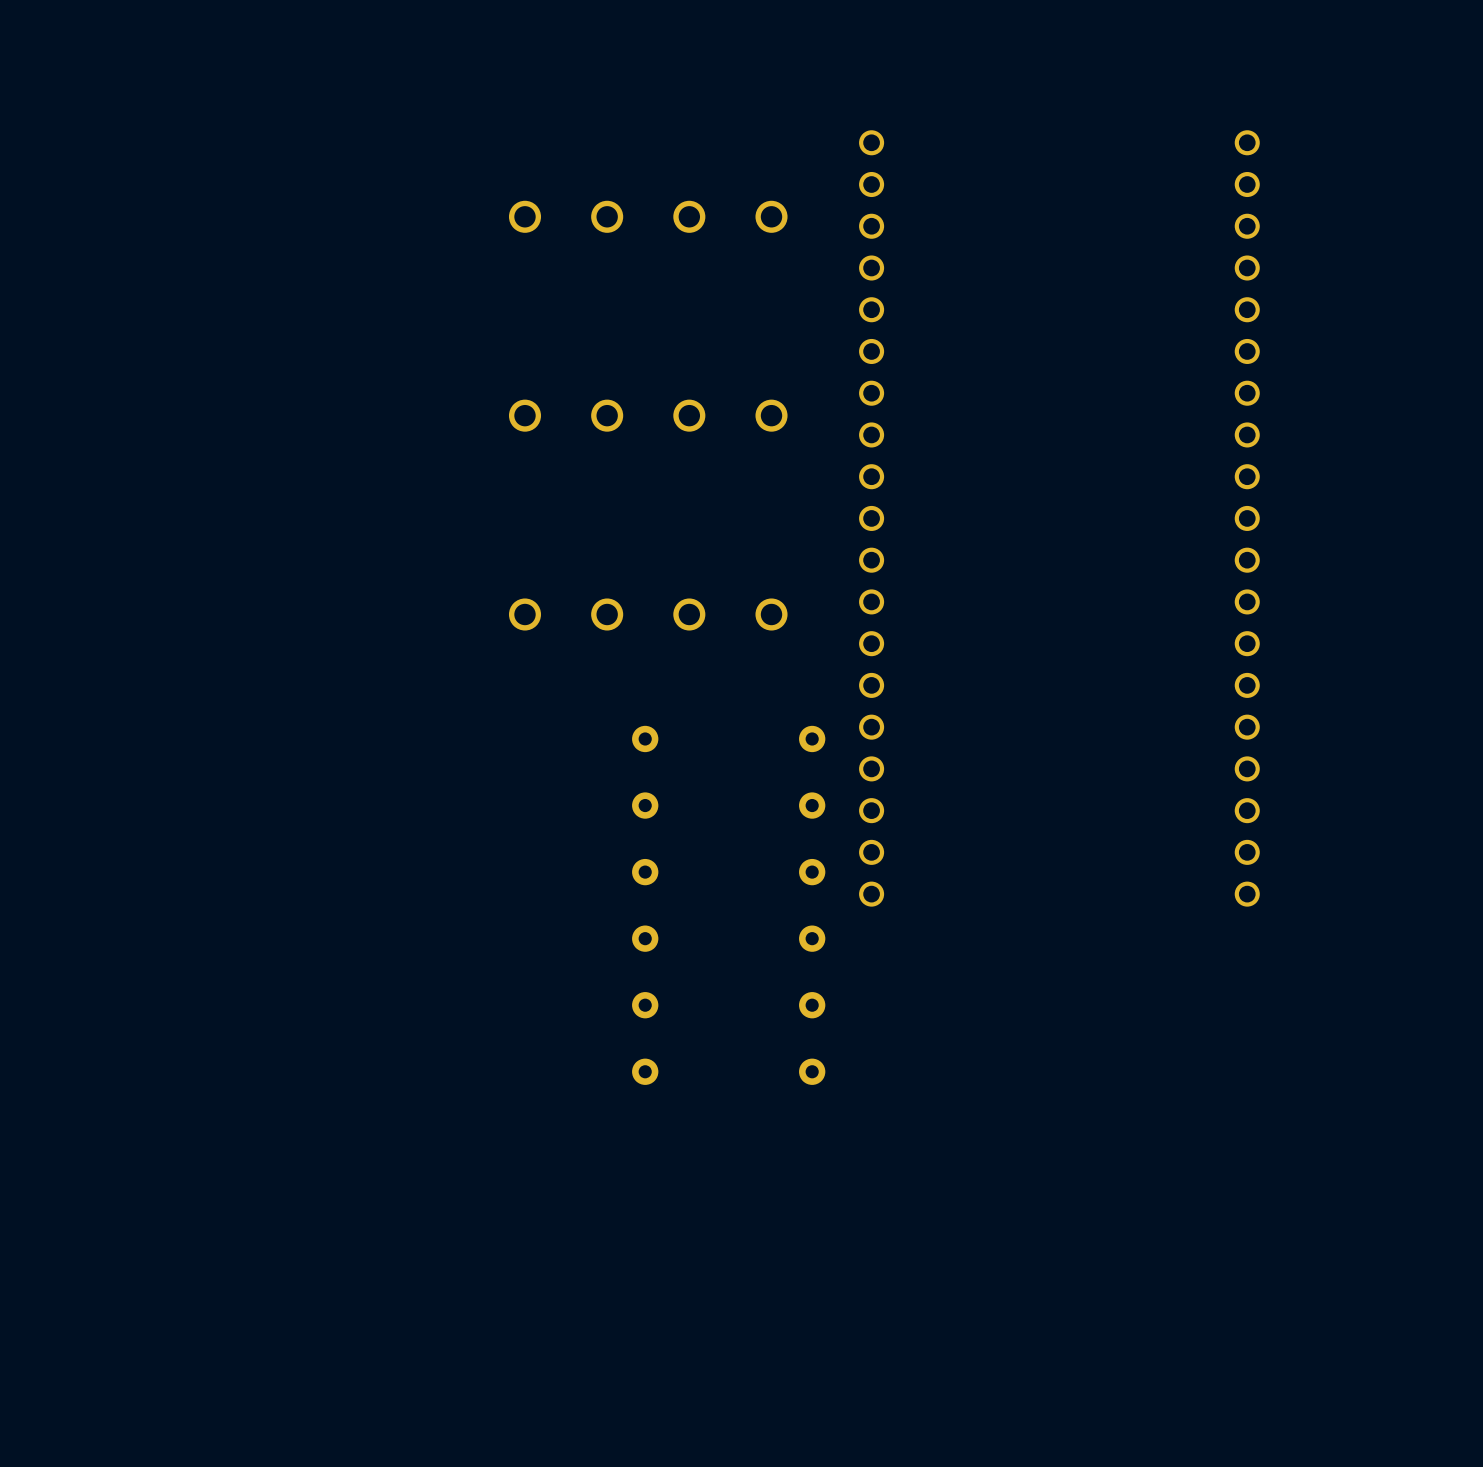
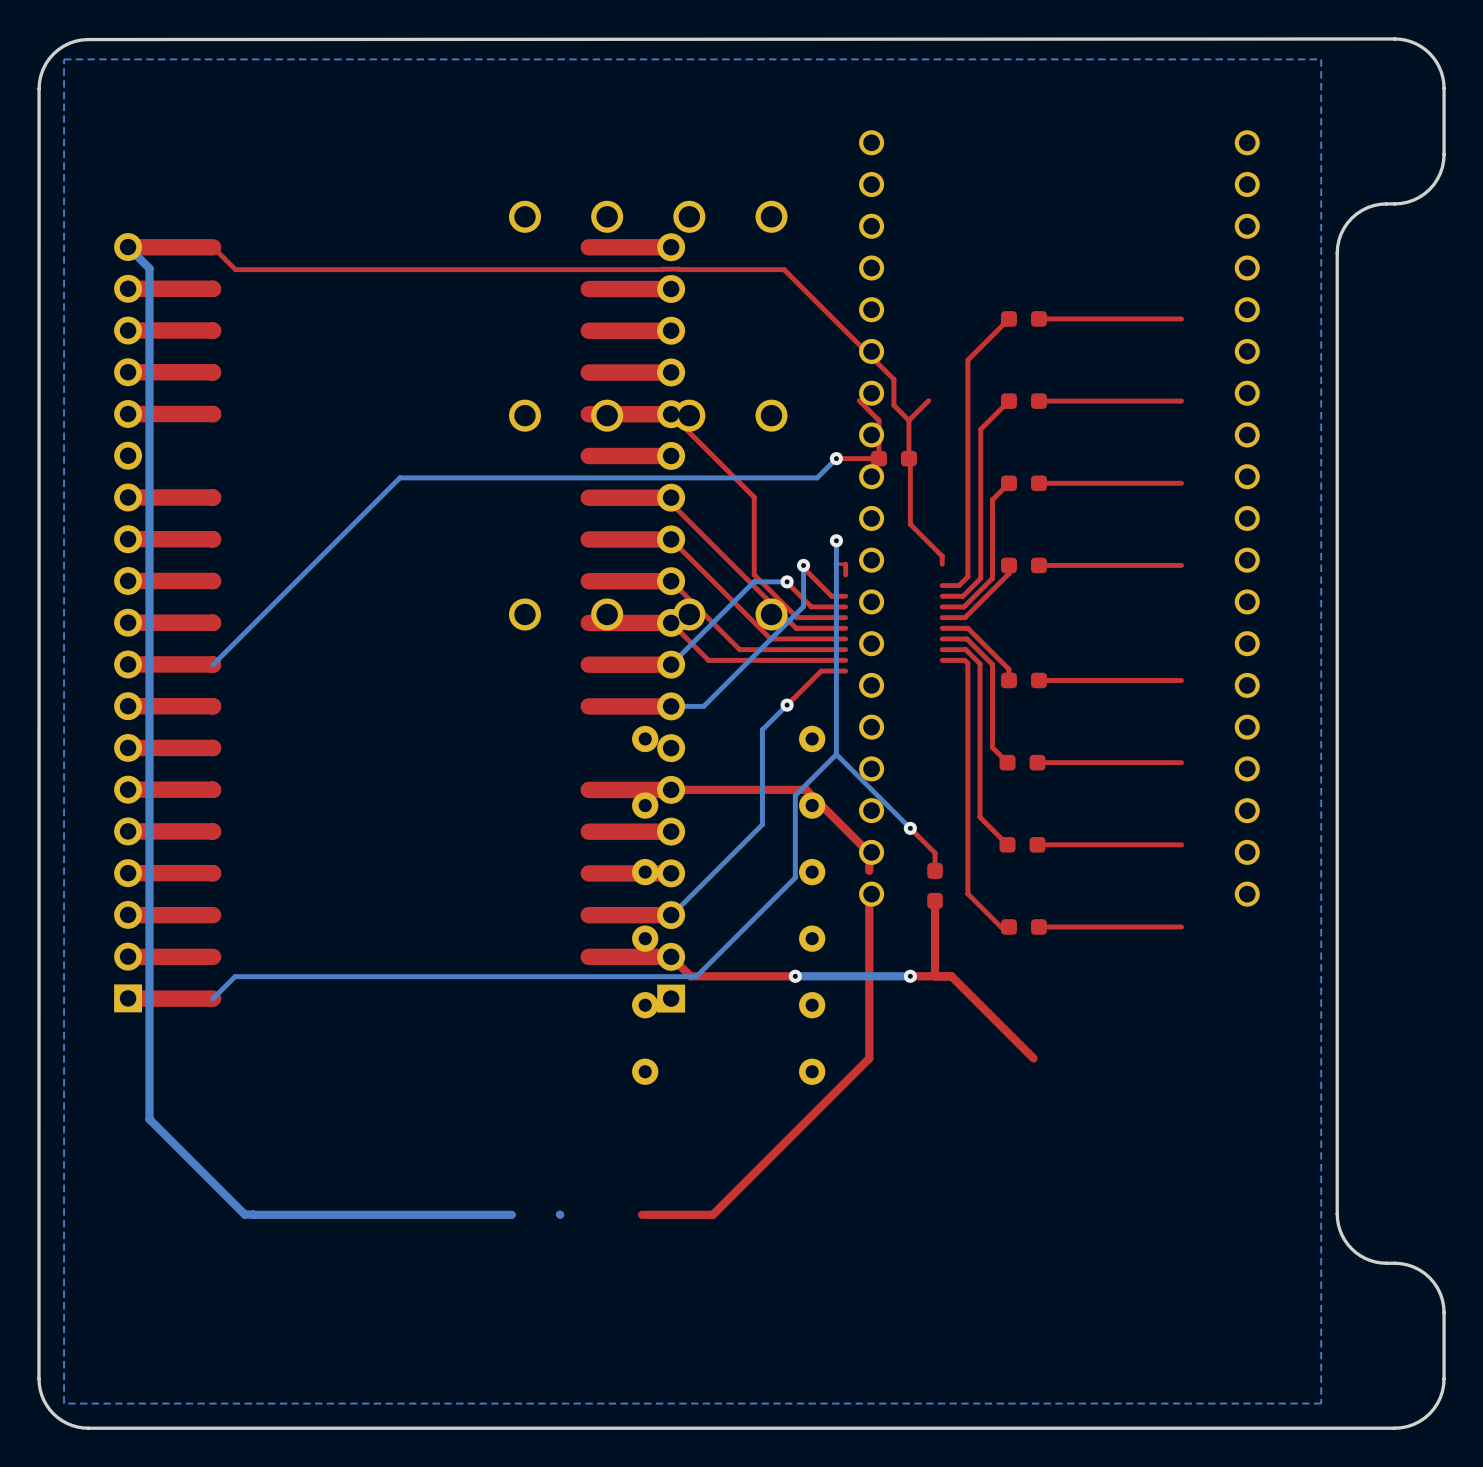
bottom zone outline: none -> (1321, 59) (64, 59) (64, 1403) (1321, 1403) (1321, 59)
top track: none -> (128, 247) (213, 247) (235, 269) (784, 269) (893, 379) (893, 405) (908, 420)
bottom track: none -> (128, 247) (149, 268) (149, 1119) (244, 1214) (511, 1214)
top track: none -> (671, 247) (588, 247)
top track: none -> (128, 288) (213, 289)
top track: none -> (671, 289) (588, 289)
top track: none -> (1008, 318) (967, 360) (967, 576) (958, 585) (942, 585)
part: none -> (1023, 318)
top track: none -> (1181, 318) (1038, 318)
top track: none -> (128, 330) (213, 330)
top track: none -> (671, 330) (588, 330)
top track: none -> (128, 372) (213, 372)
top track: none -> (671, 372) (588, 372)
top track: none -> (859, 400) (878, 420) (878, 458) (836, 458)
top track: none -> (928, 400) (908, 420)
top track: none -> (1008, 401) (980, 429) (980, 578) (962, 596) (942, 596)
part: none -> (1023, 401)
top track: none -> (1181, 401) (1038, 401)
top track: none -> (128, 413) (213, 414)
top track: none -> (588, 414) (671, 414) (754, 497) (754, 574) (797, 617) (845, 617)
top track: none -> (908, 420) (910, 524) (942, 556) (942, 564)
top track: none -> (671, 456) (588, 456)
bottom track: none -> (836, 458) (817, 477) (399, 477) (213, 664)
via: none -> (836, 458)
part: none -> (893, 458)
top track: none -> (1008, 483) (992, 499) (992, 578) (963, 606) (942, 606)
part: none -> (1023, 483)
top track: none -> (1181, 483) (1038, 483)
top track: none -> (128, 497) (213, 497)
top track: none -> (588, 497) (671, 497) (671, 503) (796, 628) (845, 628)
top track: none -> (128, 539) (213, 539)
top track: none -> (588, 539) (671, 539) (770, 638) (845, 638)
bottom track: none -> (836, 540) (836, 754)
via: none -> (836, 540)
top track: none -> (835, 564) (845, 564) (845, 574)
top track: none -> (803, 565) (803, 568) (831, 596) (845, 596)
bottom track: none -> (803, 565) (803, 606) (703, 706) (671, 706)
via: none -> (803, 565)
top track: none -> (1008, 565) (1008, 573) (965, 617) (942, 617)
part: none -> (1023, 565)
top track: none -> (1181, 565) (1038, 565)
top track: none -> (128, 580) (213, 581)
top track: none -> (588, 581) (671, 581) (739, 649) (845, 649)
top track: none -> (787, 581) (811, 606) (845, 606)
bottom track: none -> (787, 581) (753, 581) (671, 664)
via: none -> (787, 581)
top track: none -> (128, 622) (213, 622)
part: none -> (128, 622)
top track: none -> (588, 622) (671, 622) (708, 660) (845, 660)
part: none -> (671, 622)
top track: none -> (942, 628) (967, 628) (1008, 669) (1008, 680)
top track: none -> (942, 638) (966, 638) (992, 664) (992, 747) (1007, 762)
top track: none -> (942, 649) (965, 649) (980, 663) (980, 817) (1007, 844)
top track: none -> (942, 660) (964, 660) (967, 663) (967, 893) (1000, 926) (1008, 926)
top track: none -> (128, 664) (213, 664)
top track: none -> (671, 664) (588, 664)
top track: none -> (845, 671) (821, 671) (787, 705)
part: none -> (1023, 680)
top track: none -> (1181, 680) (1038, 680)
bottom track: none -> (787, 705) (762, 729) (762, 824) (671, 915)
via: none -> (787, 705)
top track: none -> (128, 706) (213, 706)
top track: none -> (671, 706) (588, 706)
top track: none -> (128, 747) (213, 748)
bottom track: none -> (836, 754) (910, 828)
bottom track: none -> (836, 754) (795, 795) (795, 877) (696, 976) (235, 976) (213, 998)
part: none -> (1022, 762)
top track: none -> (1181, 762) (1037, 762)
top track: none -> (128, 789) (213, 789)
top track: none -> (588, 789) (806, 789) (869, 853) (869, 870)
top track: none -> (910, 828) (935, 853) (935, 870)
via: none -> (910, 828)
top track: none -> (128, 831) (213, 831)
top track: none -> (671, 831) (588, 831)
part: none -> (1022, 844)
top track: none -> (1181, 844) (1037, 844)
top track: none -> (128, 873) (213, 873)
top track: none -> (671, 873) (588, 873)
part: none -> (935, 885)
top track: none -> (869, 900) (869, 1058) (712, 1214) (642, 1214)
top track: none -> (935, 900) (935, 976)
top track: none -> (213, 915) (128, 915)
top track: none -> (671, 915) (588, 915)
part: none -> (1023, 926)
top track: none -> (1181, 926) (1038, 926)
top track: none -> (213, 956) (128, 956)
top track: none -> (588, 956) (671, 956) (690, 976) (795, 976)
via: none -> (795, 976)
top track: none -> (910, 976) (951, 976) (1033, 1058)
bottom track: none -> (910, 976) (795, 976)
via: none -> (910, 976)
top track: none -> (213, 998) (128, 998)
bottom track: none -> (559, 1214) (560, 1214)
board edge: none -> (38, 1378) (39, 88) (42, 69) (53, 53) (69, 43) (88, 39) (1394, 38) (1411, 41) (1429, 53) (1439, 66) (1443, 82) (1444, 154) (1440, 173) (1429, 189) (1413, 200) (1401, 203) (1373, 205) (1356, 214) (1343, 228) (1337, 246) (1337, 1213) (1342, 1235) (1355, 1252) (1375, 1262) (1401, 1263) (1413, 1267) (1429, 1277) (1440, 1293) (1444, 1312) (1443, 1385) (1437, 1403) (1429, 1413) (1413, 1424) (1394, 1428) (88, 1428)
board edge: none -> (39, 1378) (43, 1400) (53, 1413) (71, 1425) (88, 1428)

